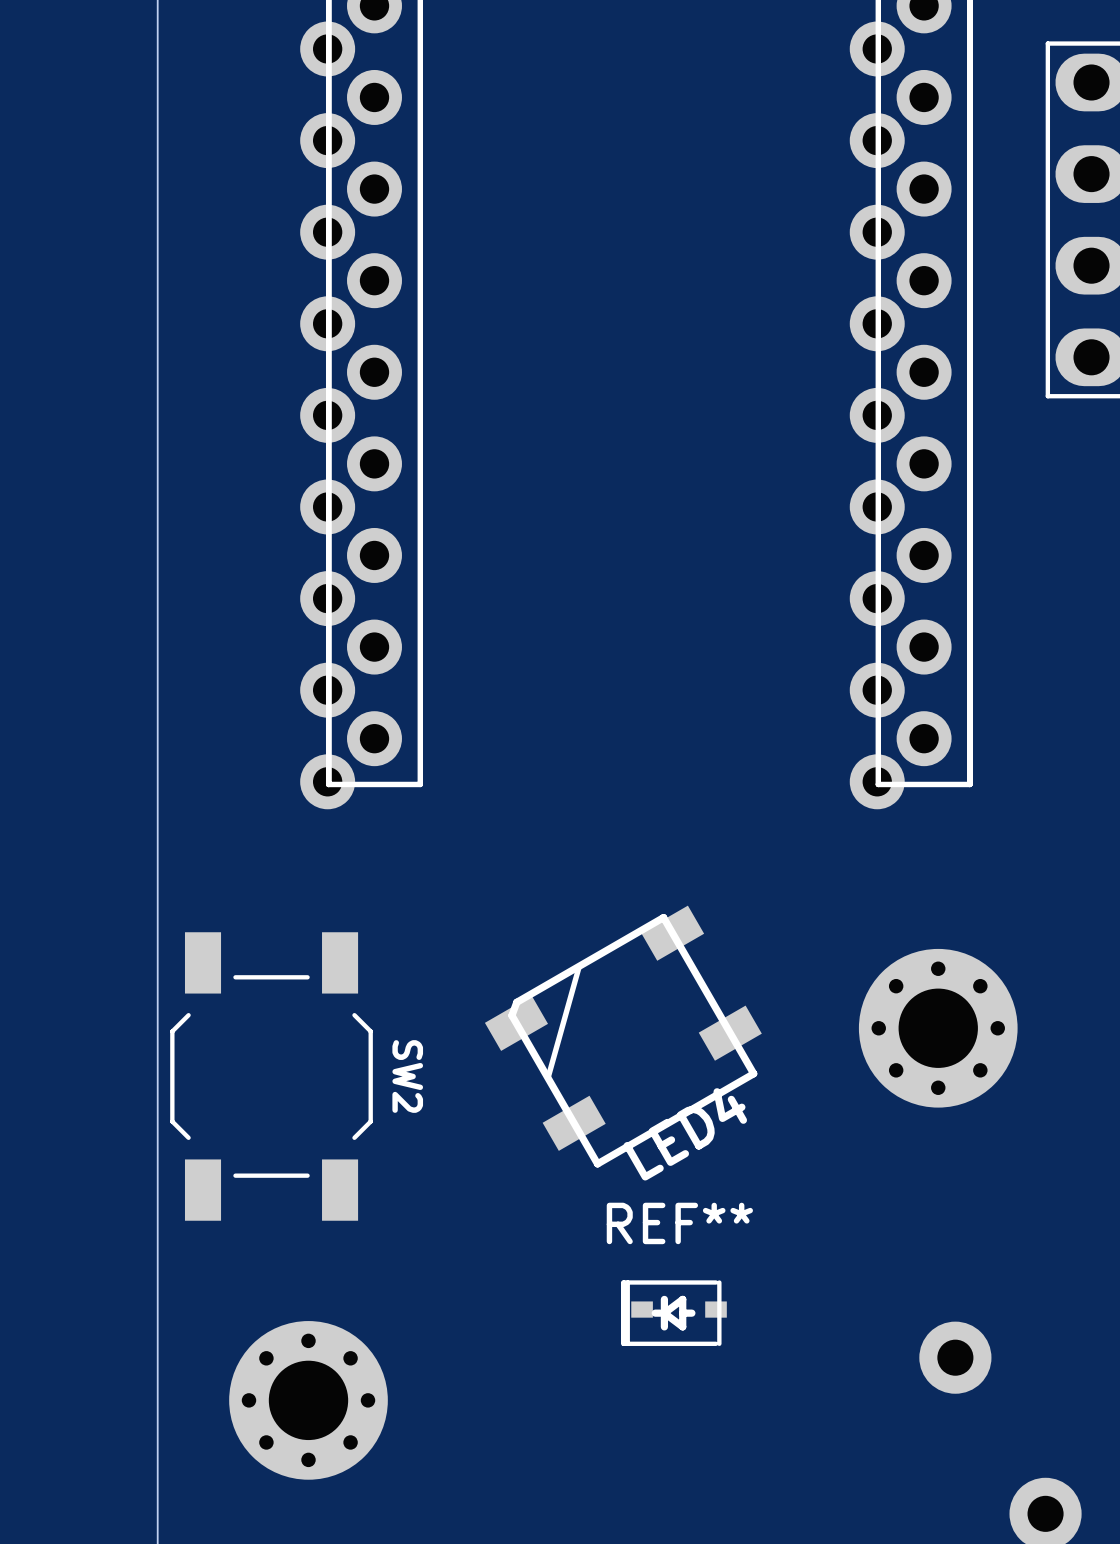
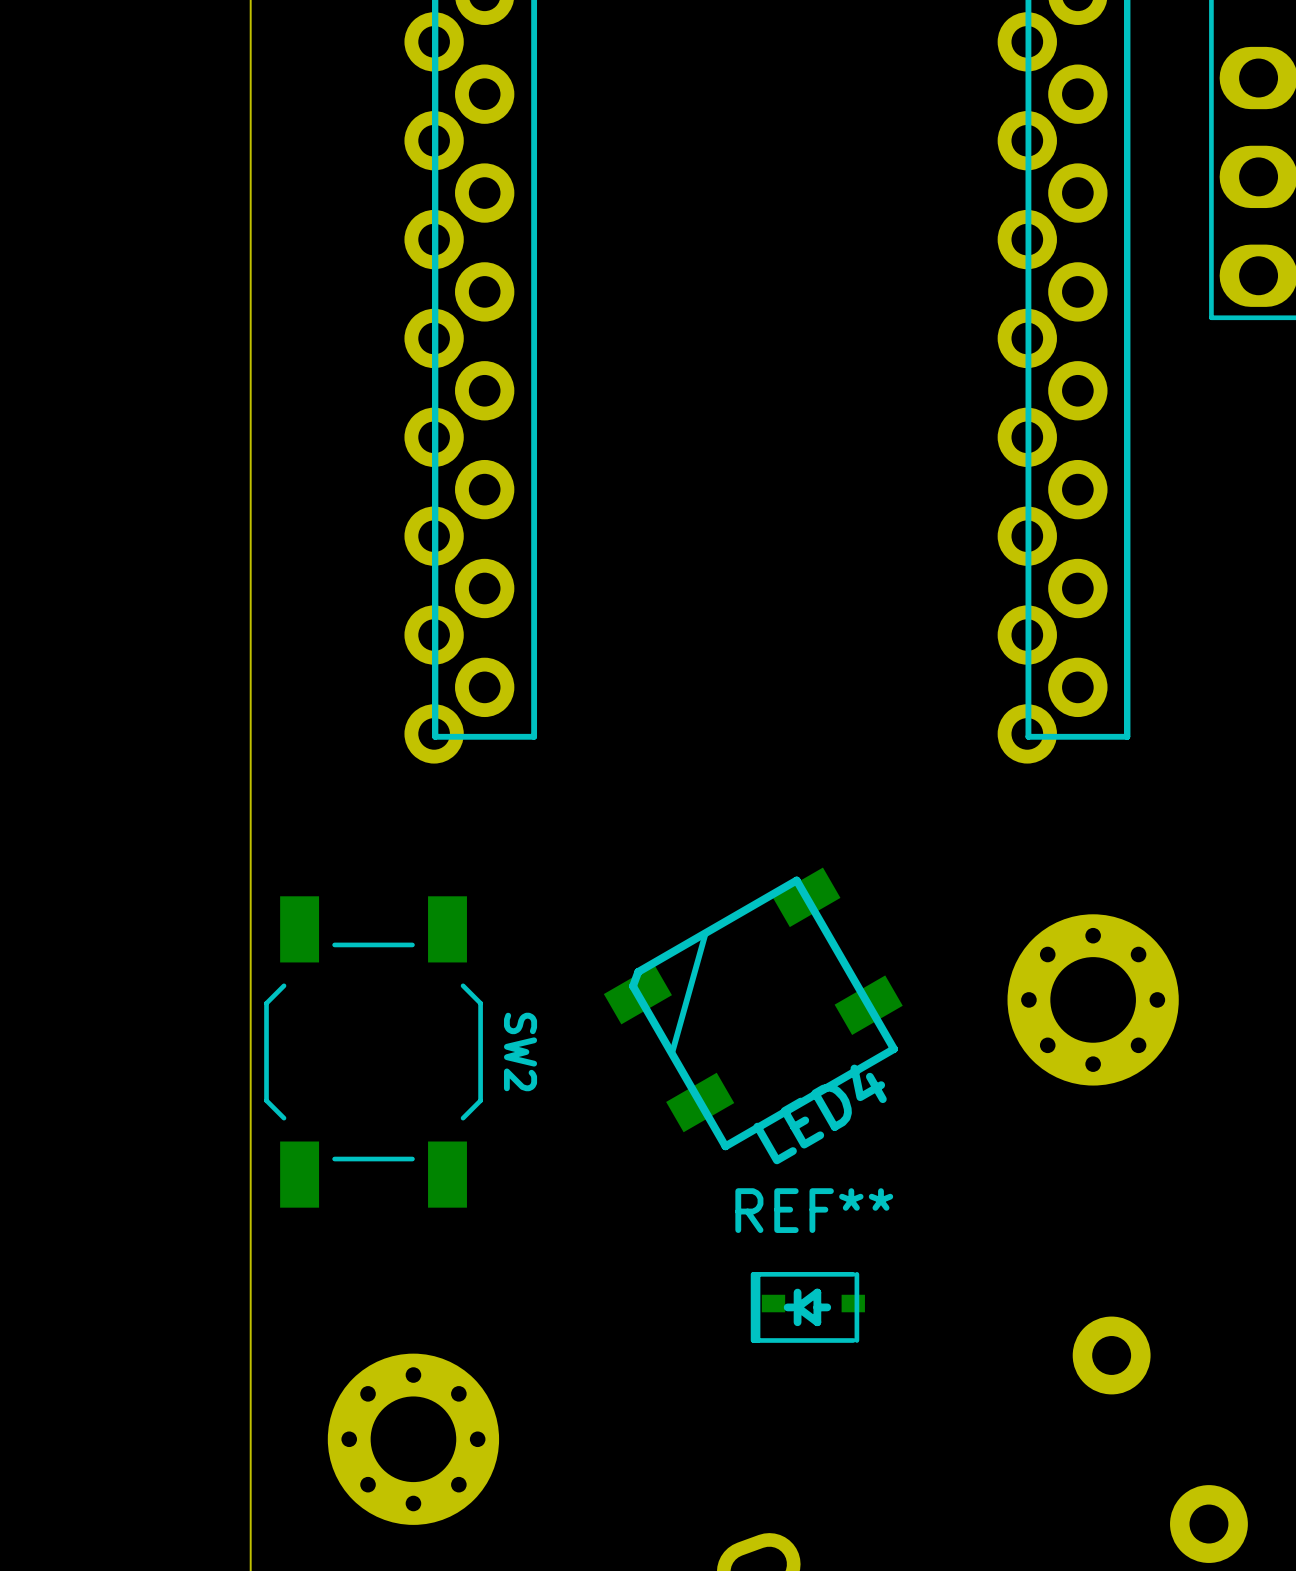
part position: (308, 1400) -> (413, 1439)

